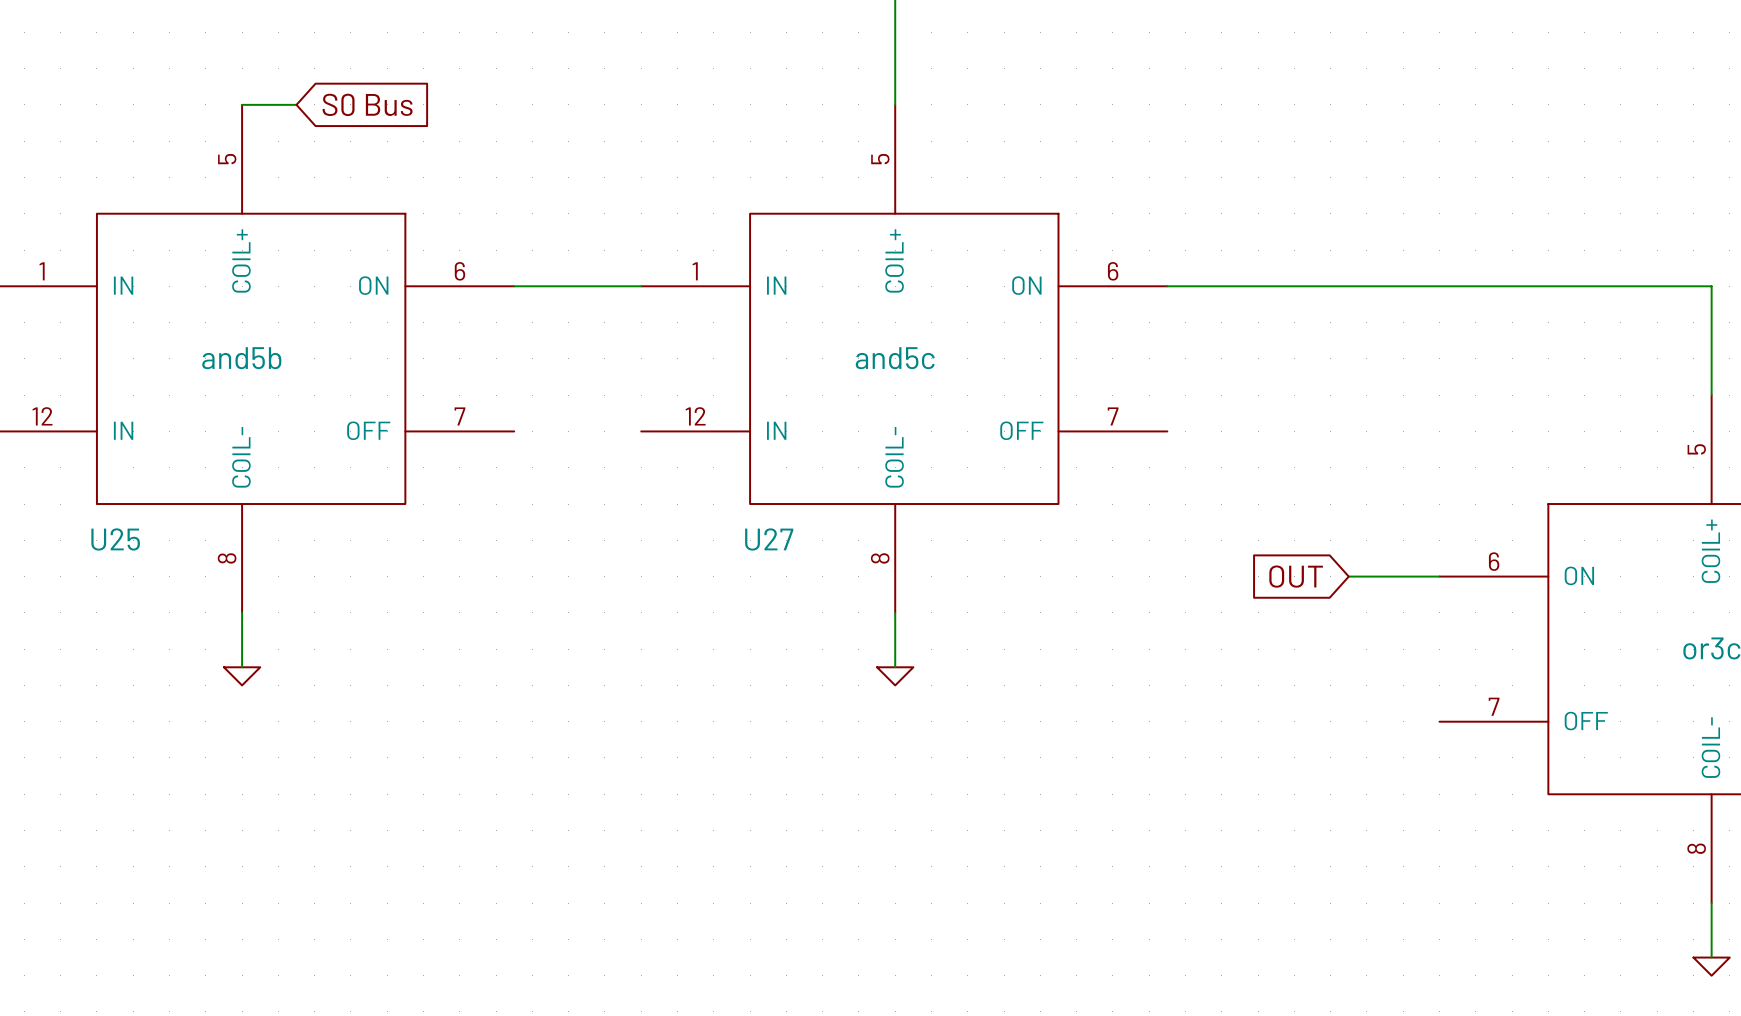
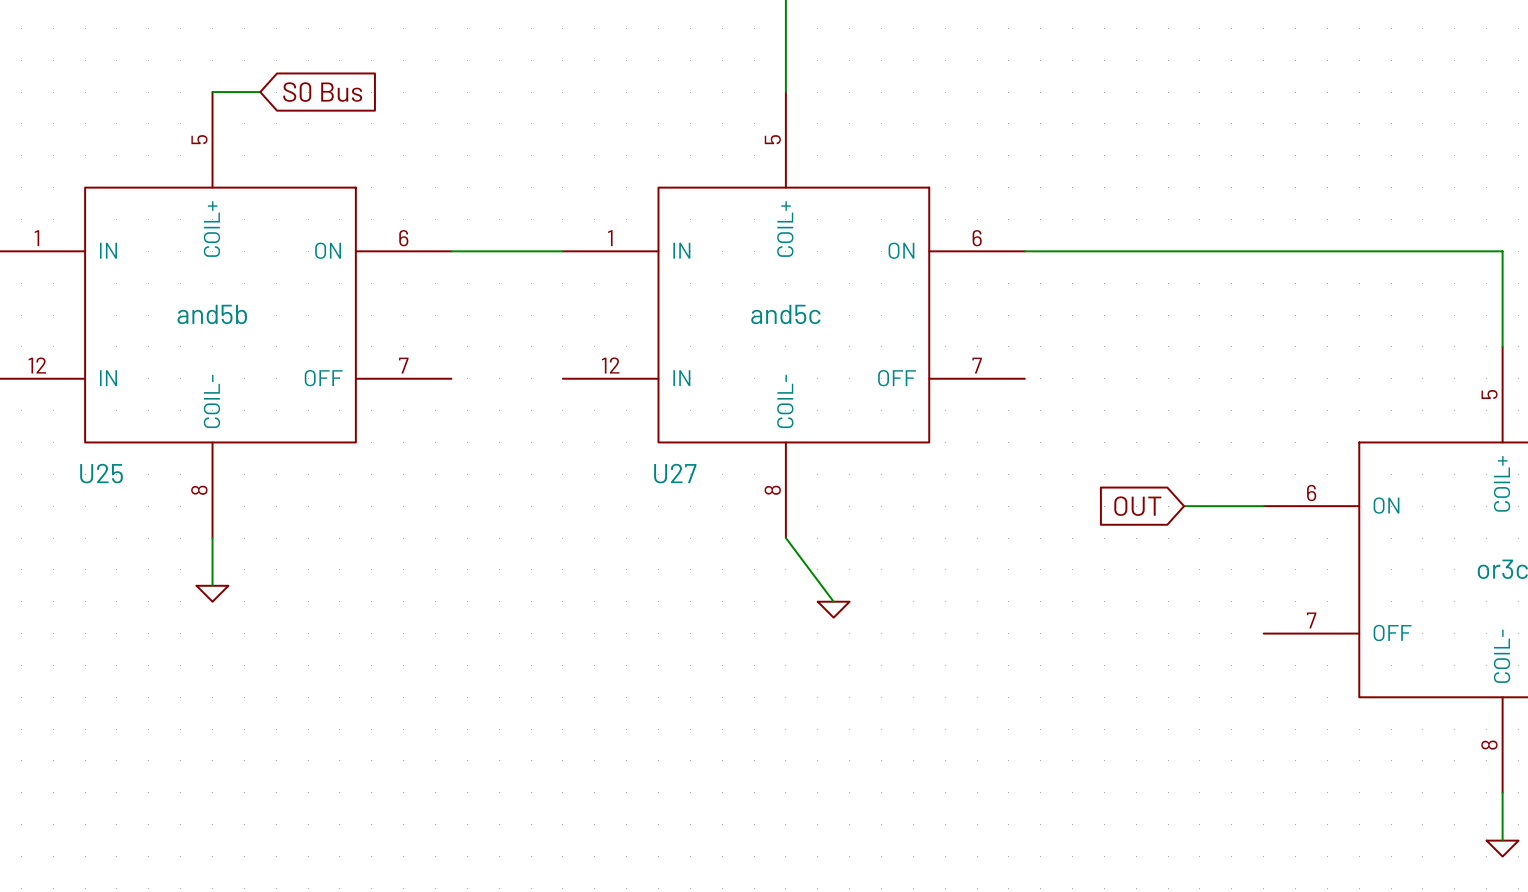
wire: (895, 612) (895, 667) -> (785, 538) (833, 601)
power symbol position: (895, 676) -> (833, 609)

